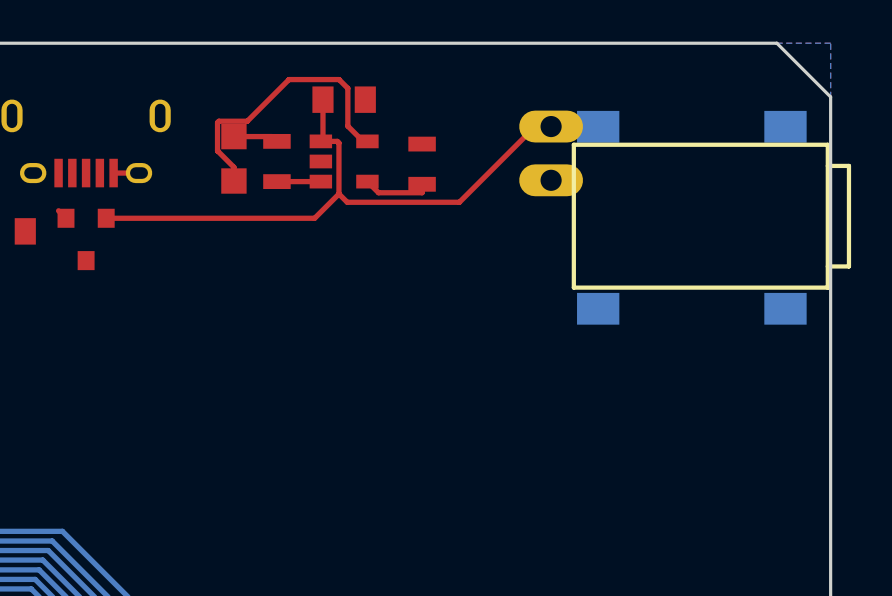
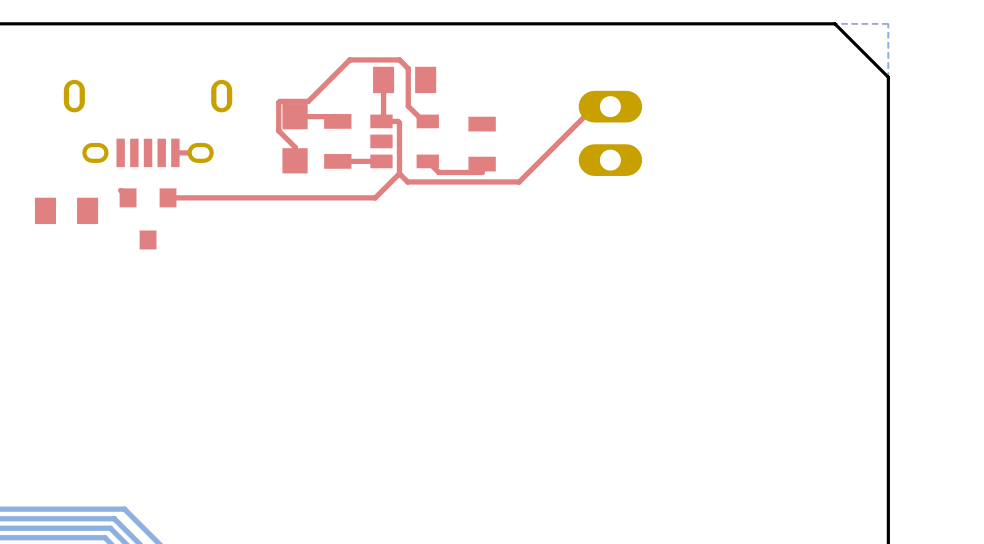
part: (711, 217) -> none

